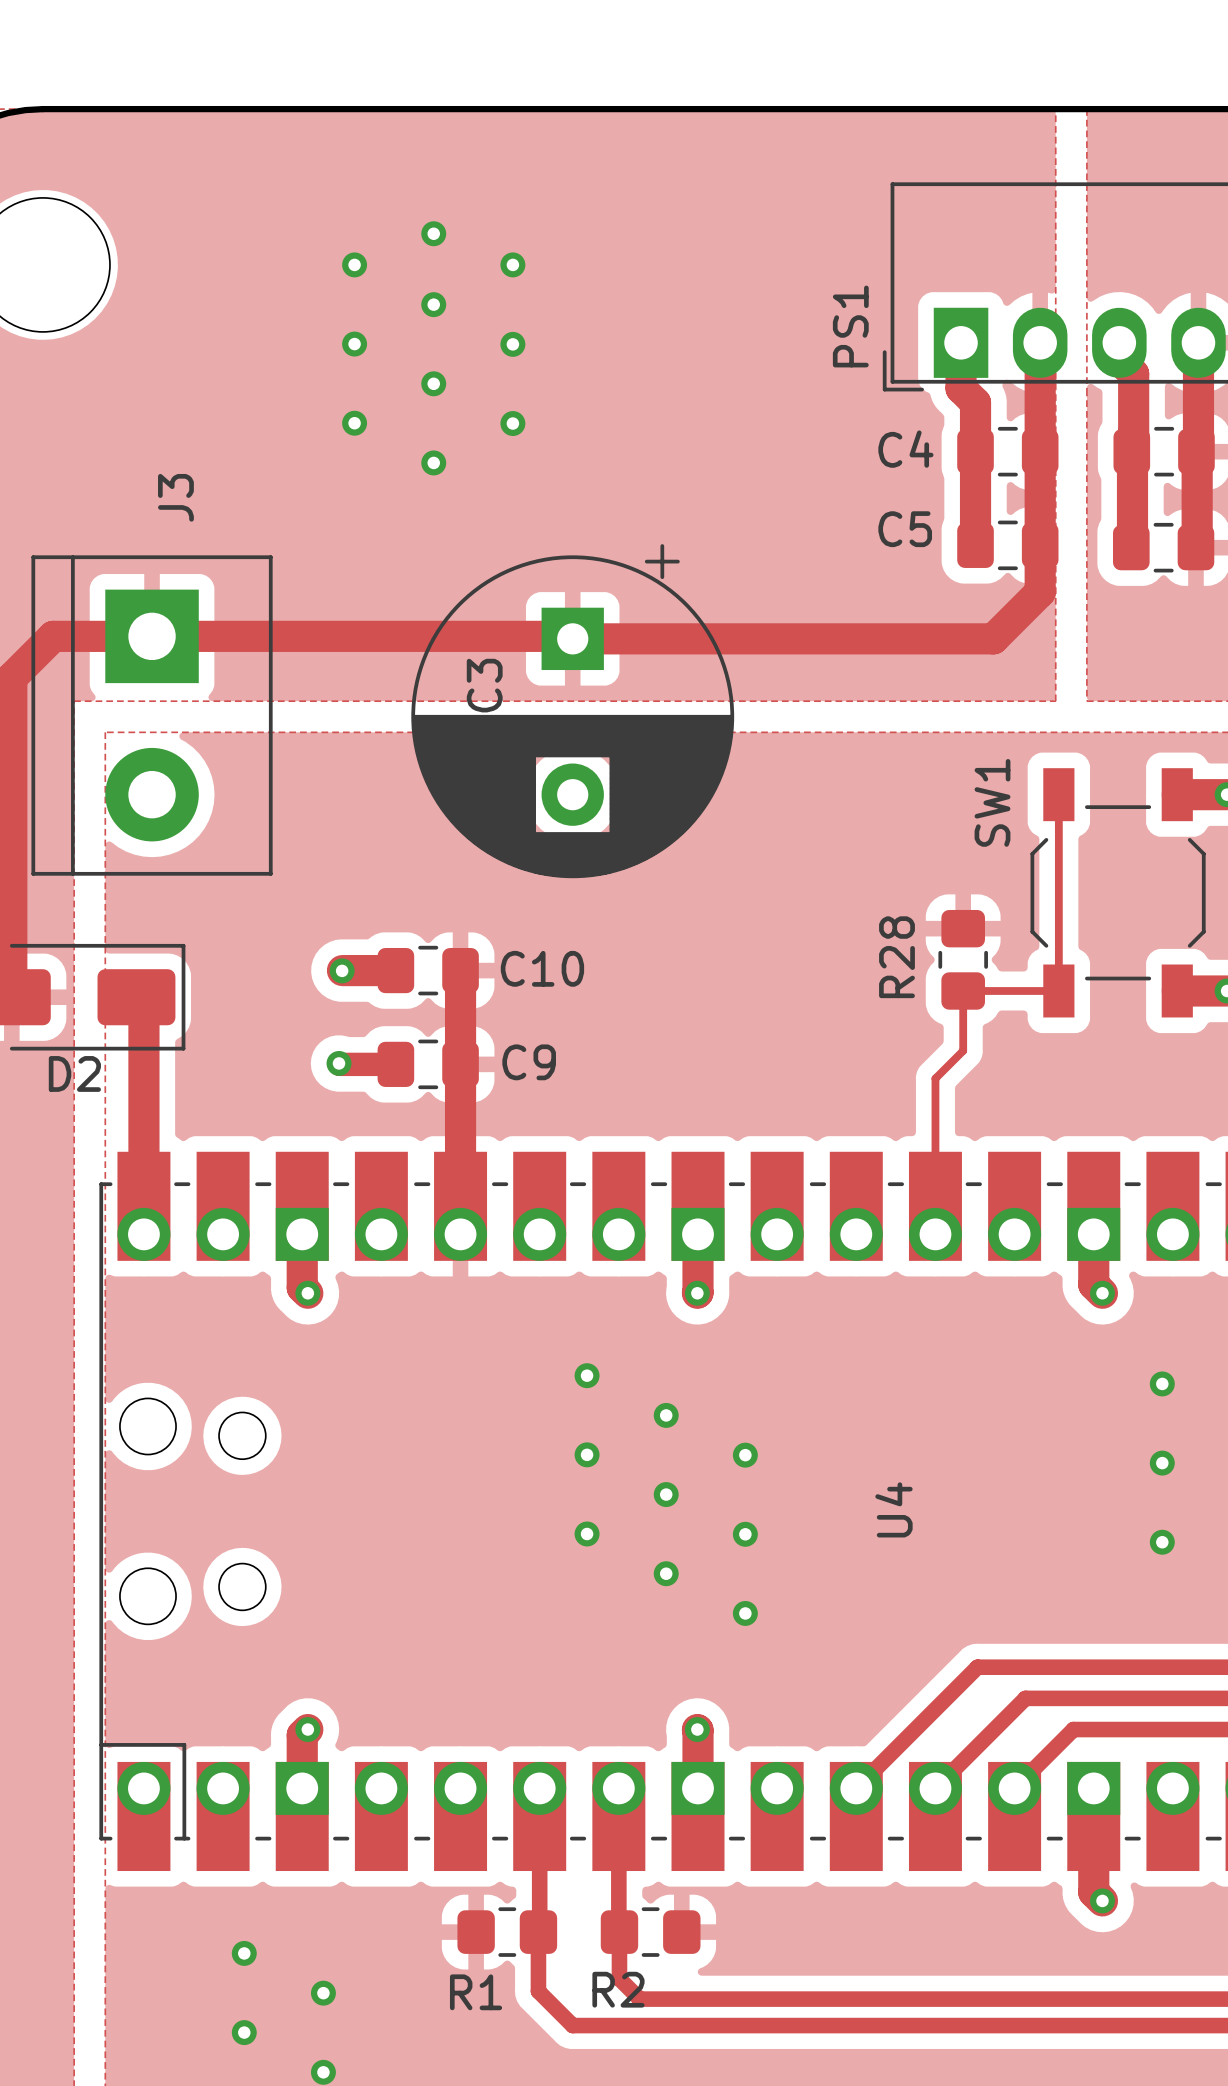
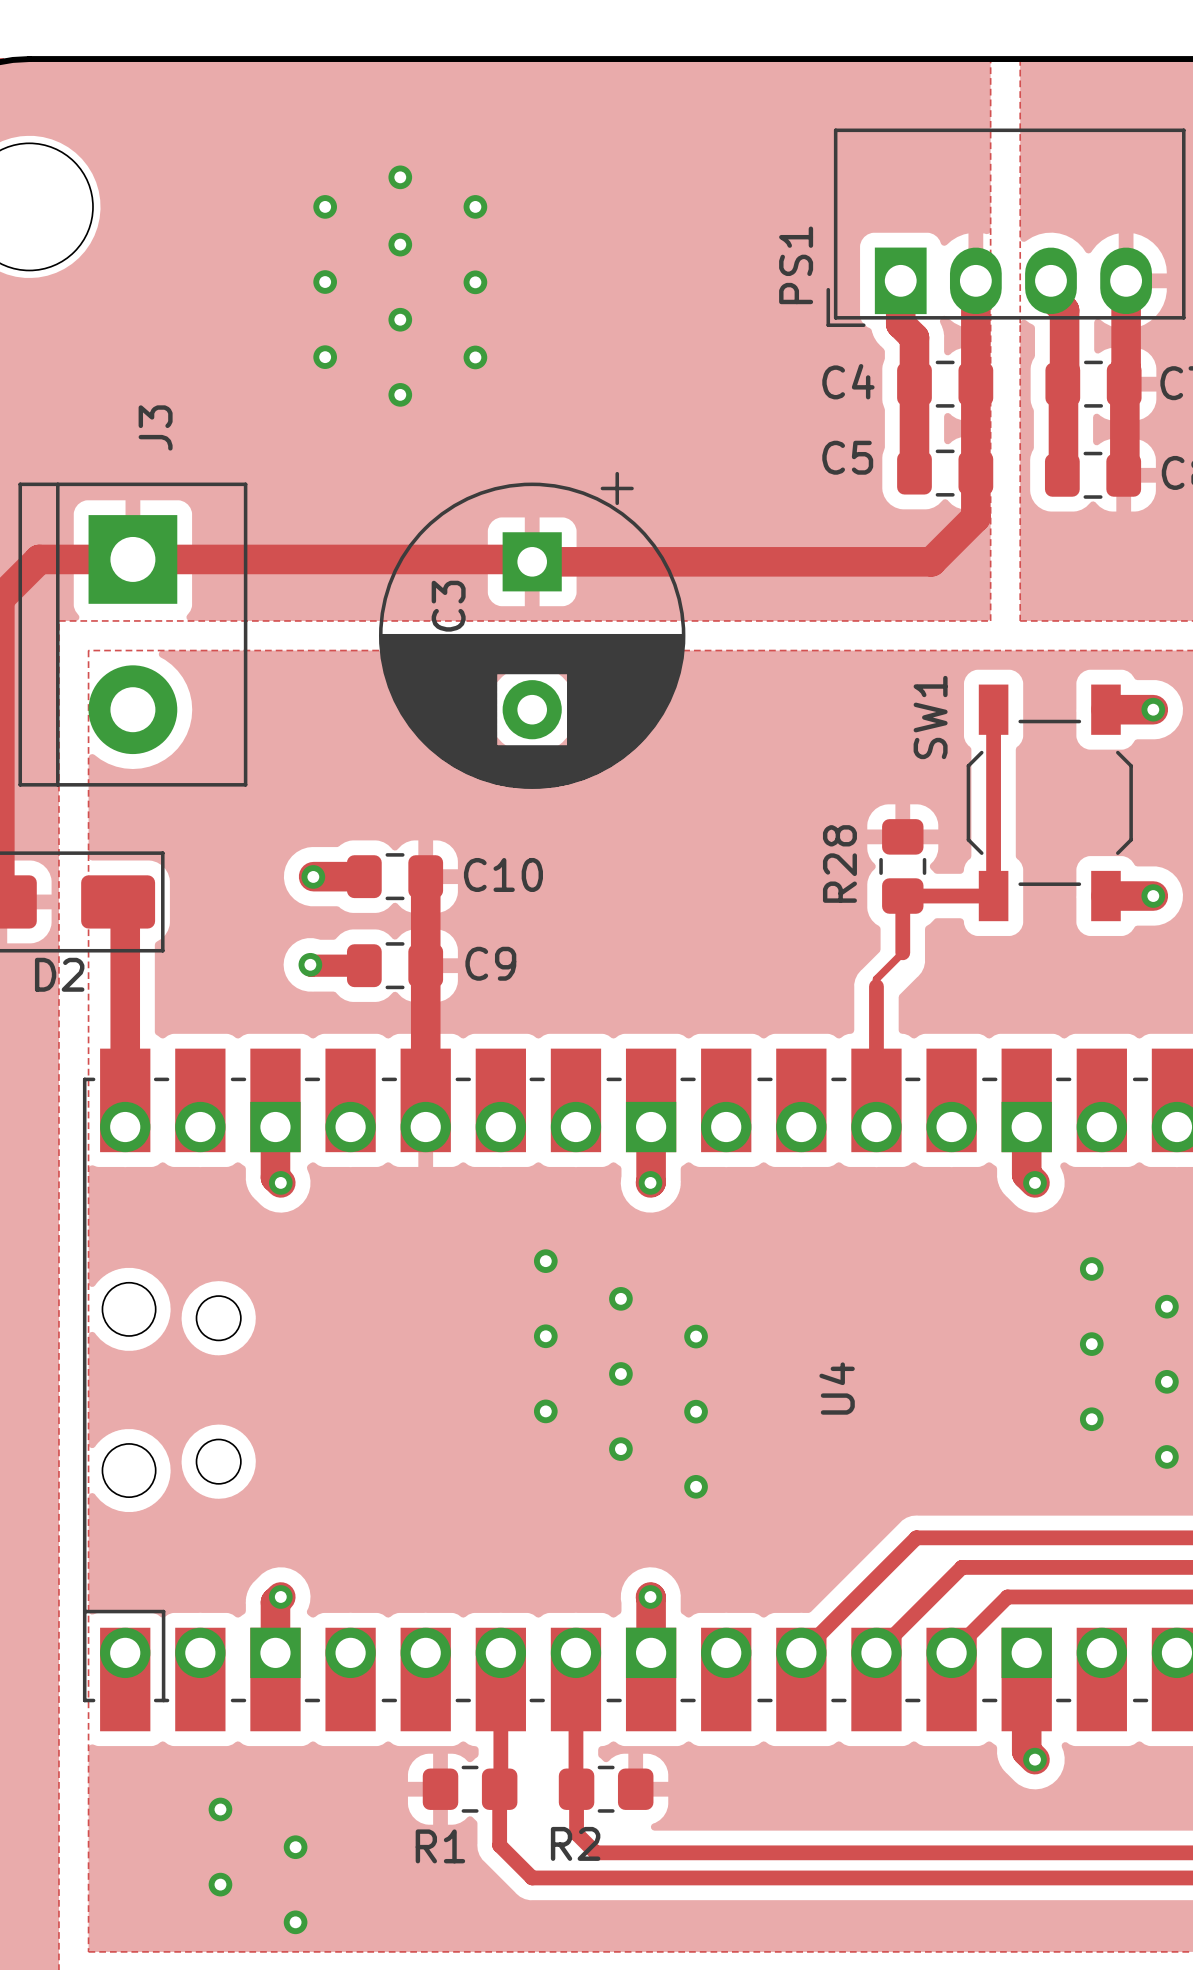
track width: thin (1058, 794) (1058, 990) (963, 990) (963, 1050) -> thick (993, 709) (993, 896) (902, 896) (902, 952)
track width: thin (935, 1086) (935, 1234) -> thick (876, 986) (876, 1127)

